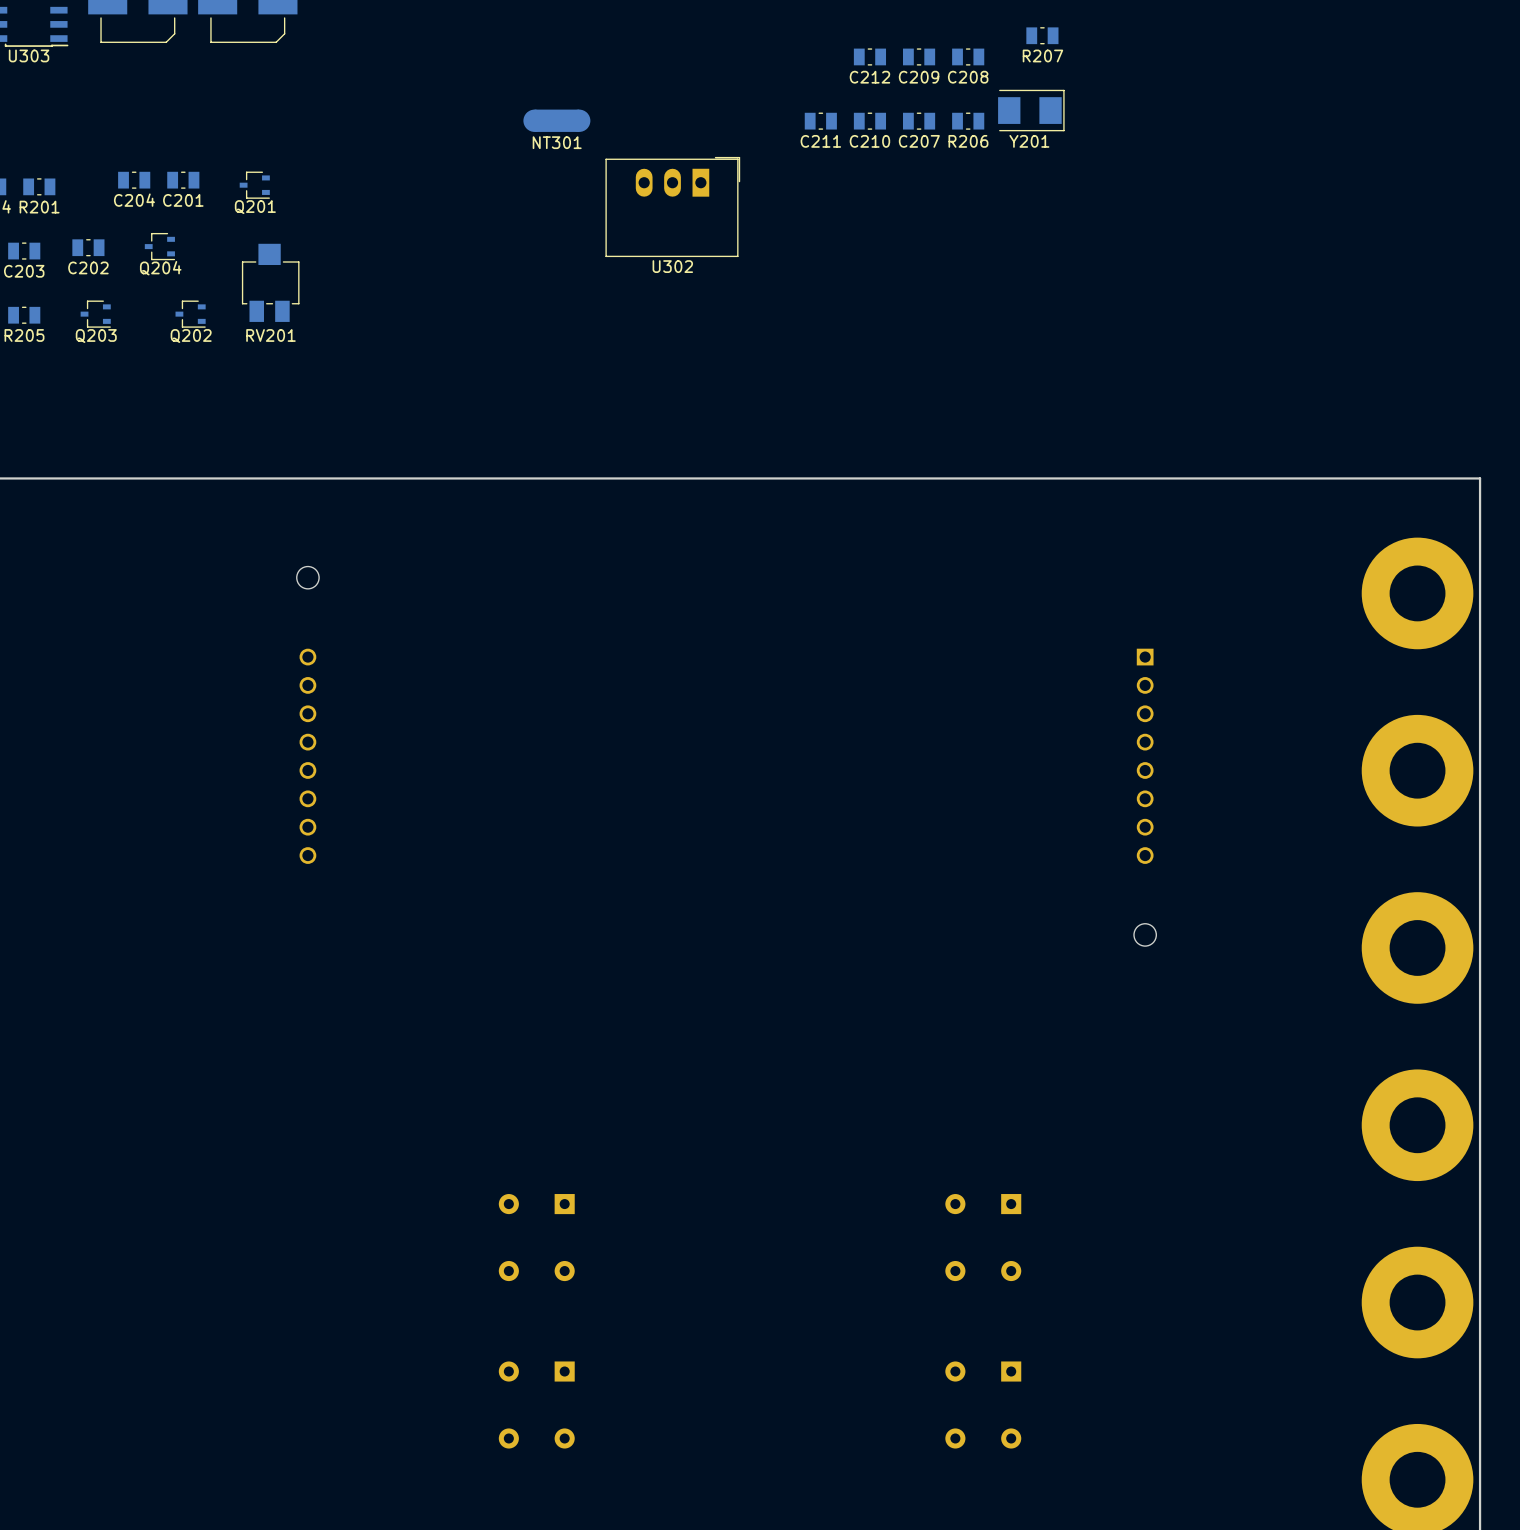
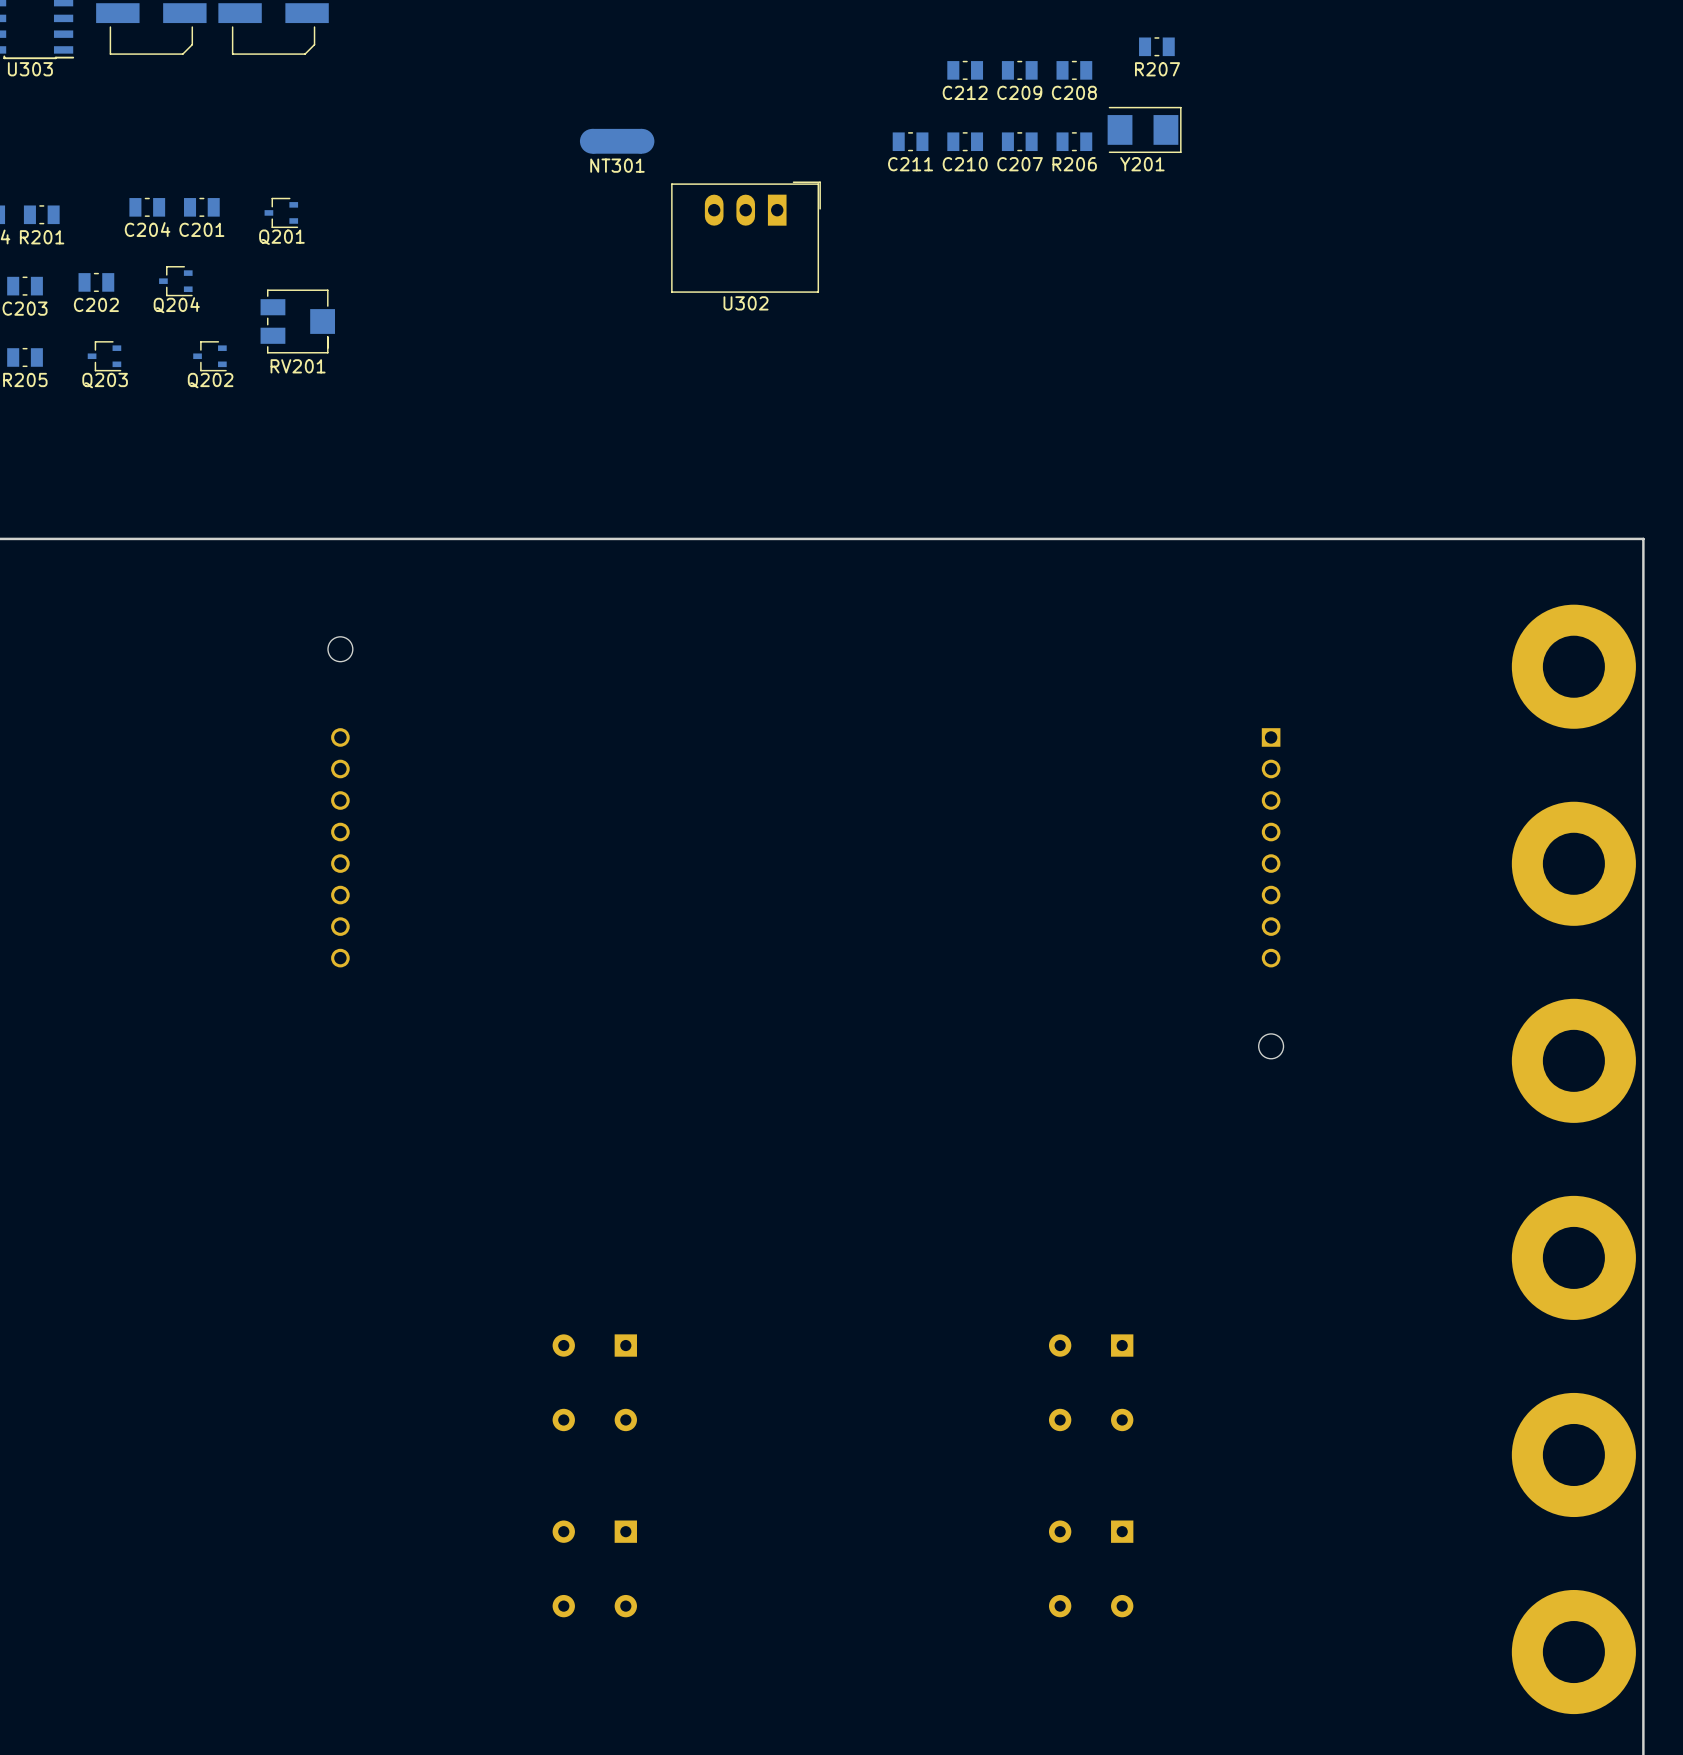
RV201 footprint: [241, 243, 300, 322] -> [260, 289, 336, 354]

